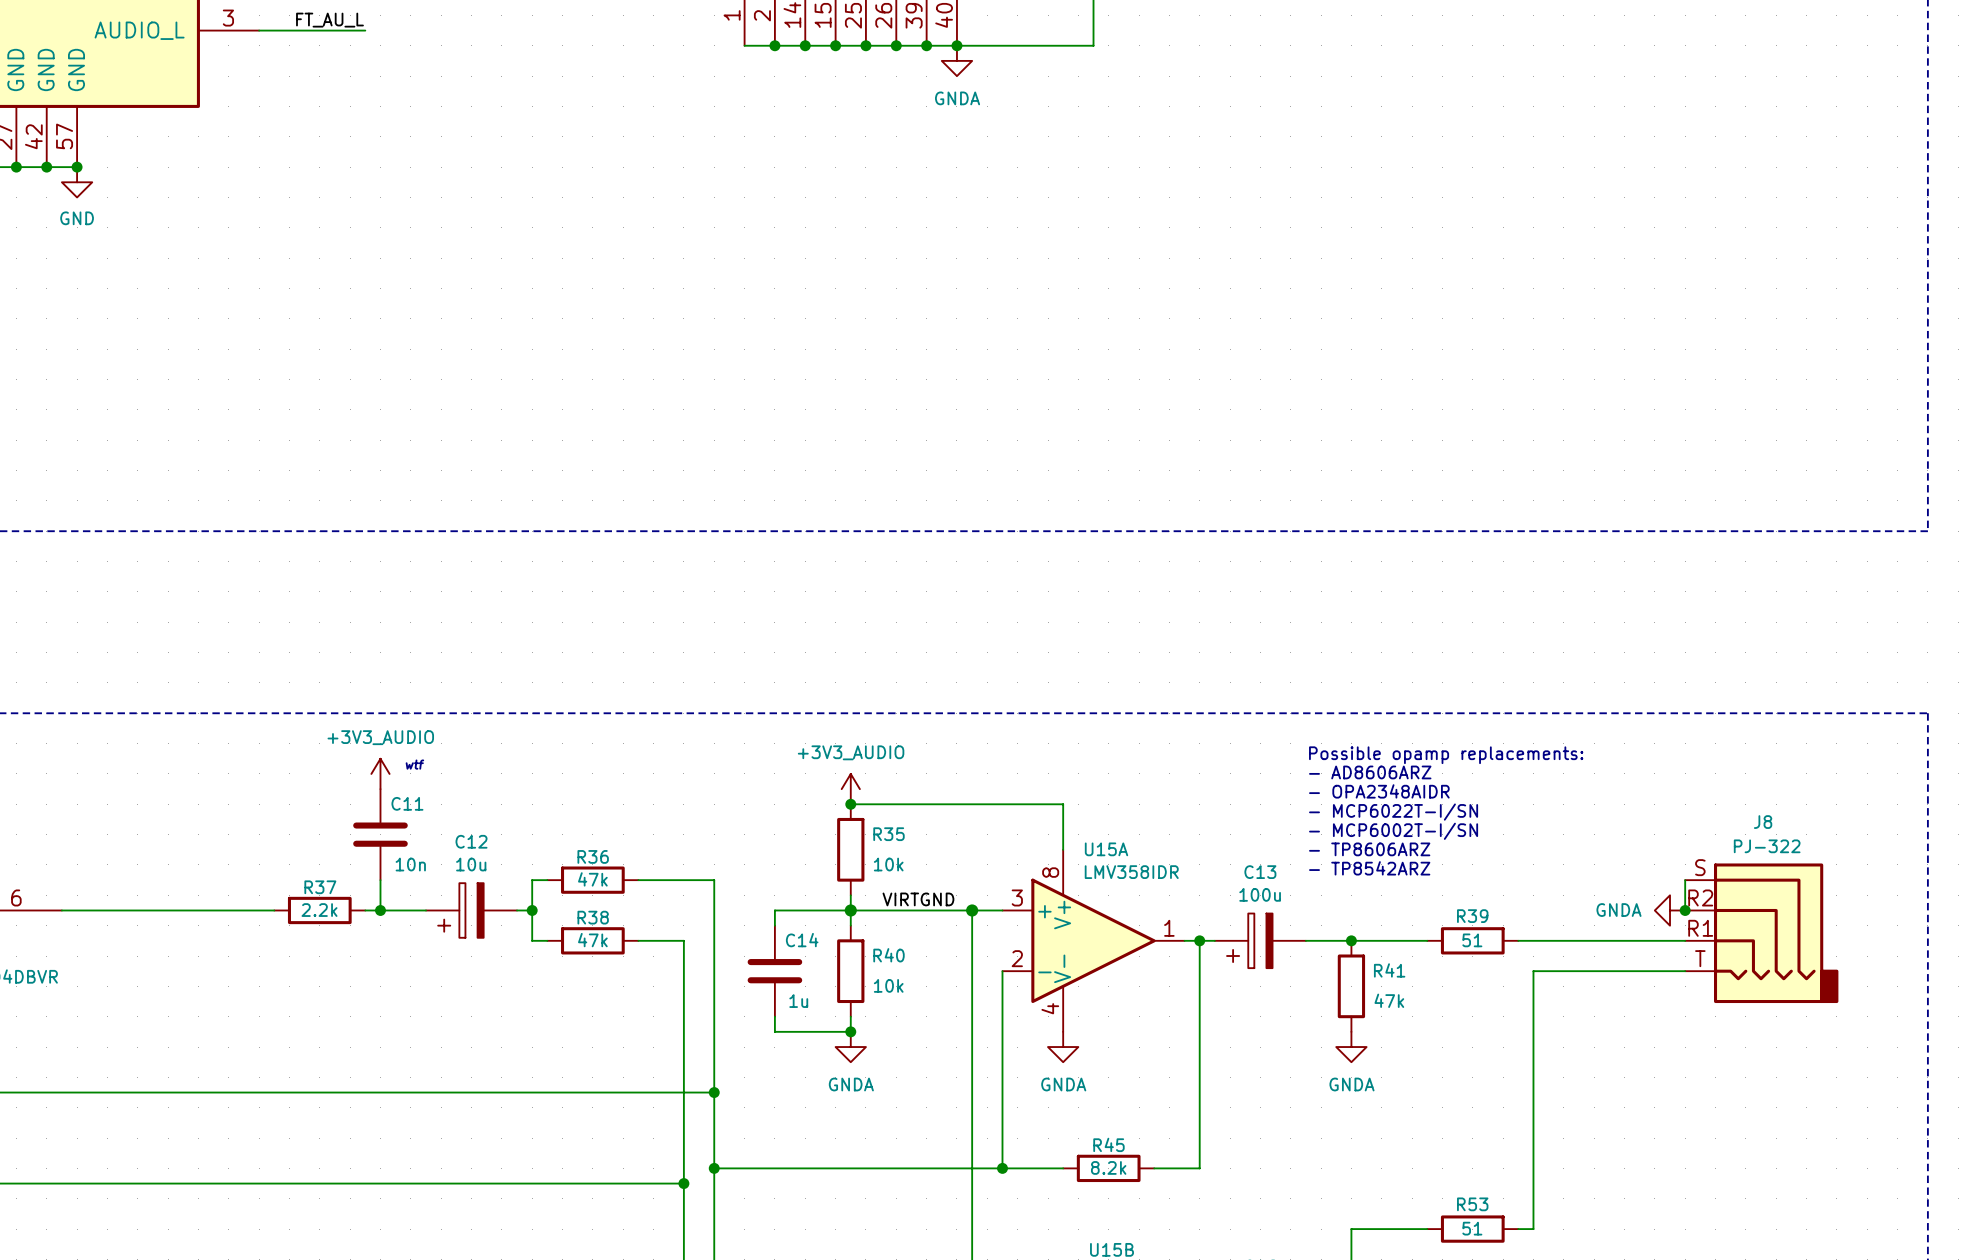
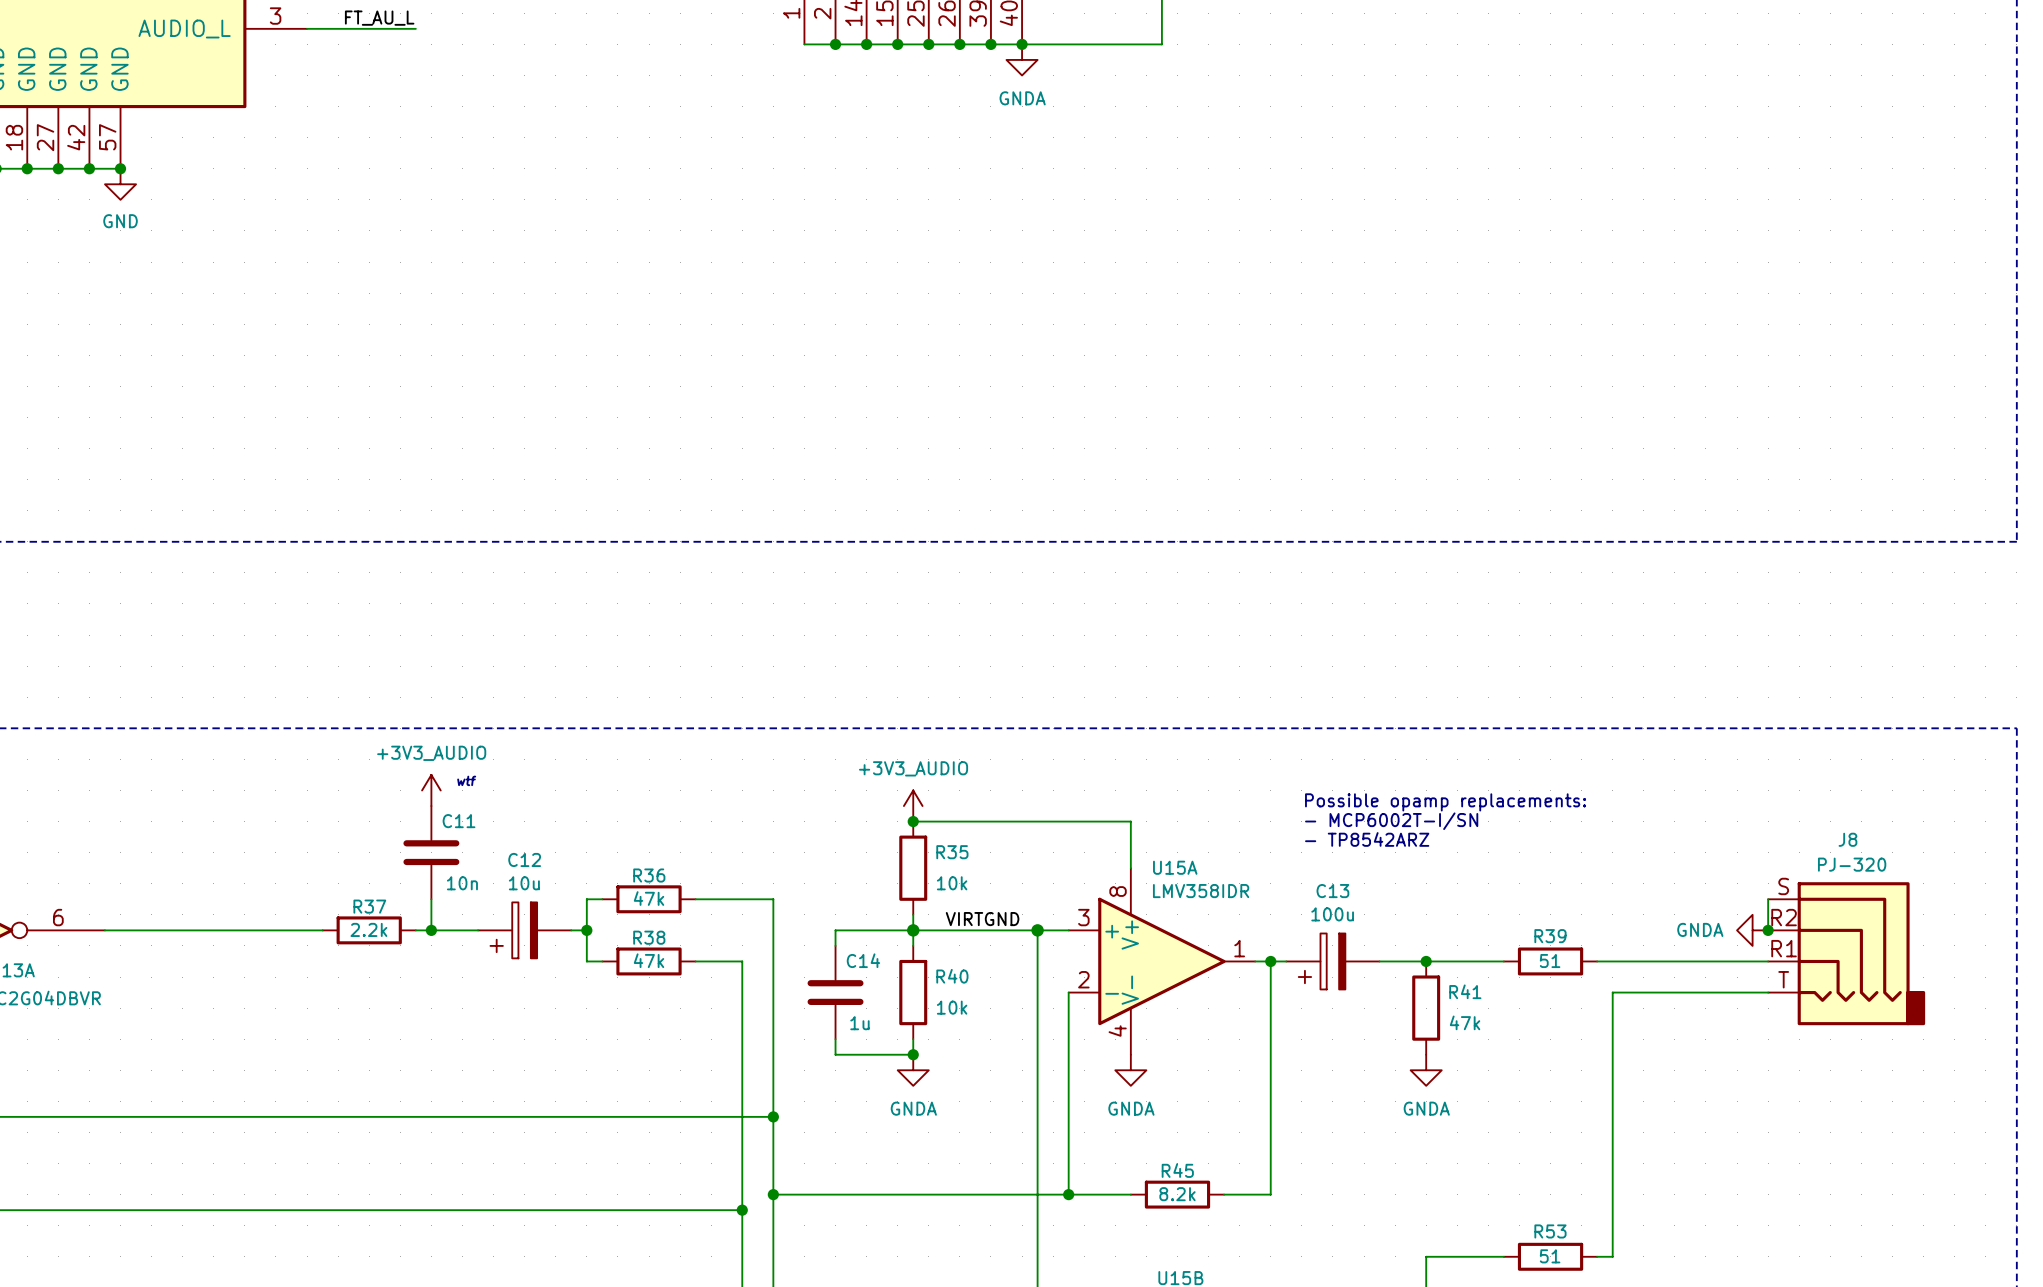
text position: Possible opamp replacements: (1446, 755) -> Possible opamp replacements: (1445, 802)
text: - AD8606ARZ (1370, 772) -> none
text: - OPA2348AIDR (1379, 791) -> none
text: - MCP6022T-I/SN (1393, 812) -> none
text position: - MCP6002T-I/SN (1393, 831) -> - MCP6002T-I/SN (1391, 821)
J8 value: PJ-322 (1767, 846) -> PJ-320 (1852, 864)
text: - TP8606ARZ (1369, 849) -> none
text position: - TP8542ARZ (1369, 868) -> - TP8542ARZ (1367, 839)

